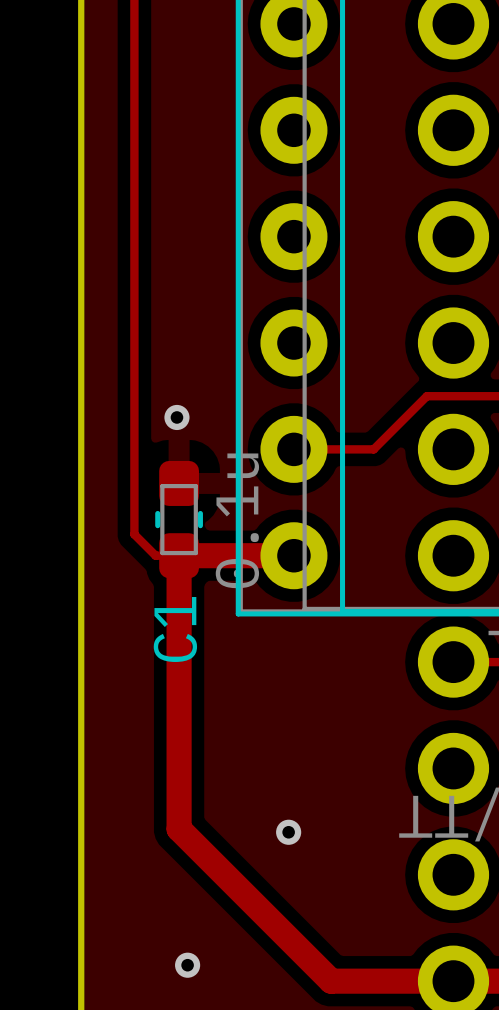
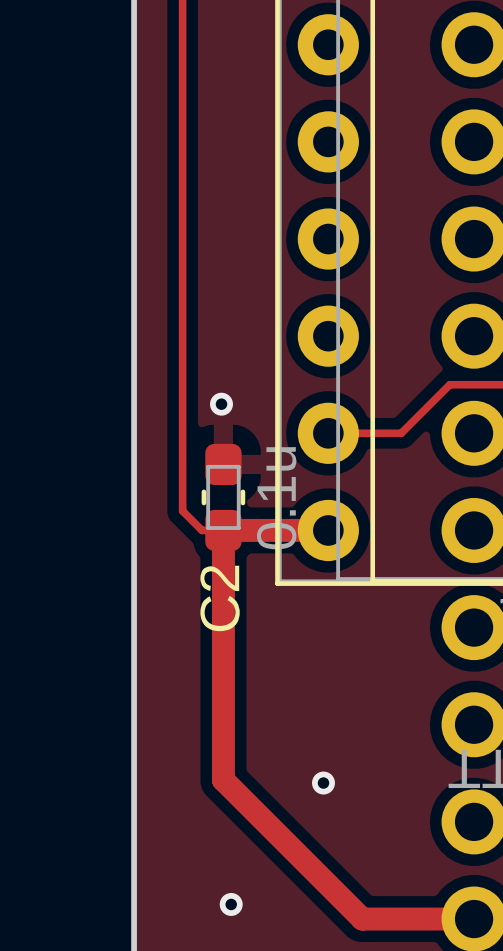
C1 name: C1 (175, 629) -> C2 (220, 598)

